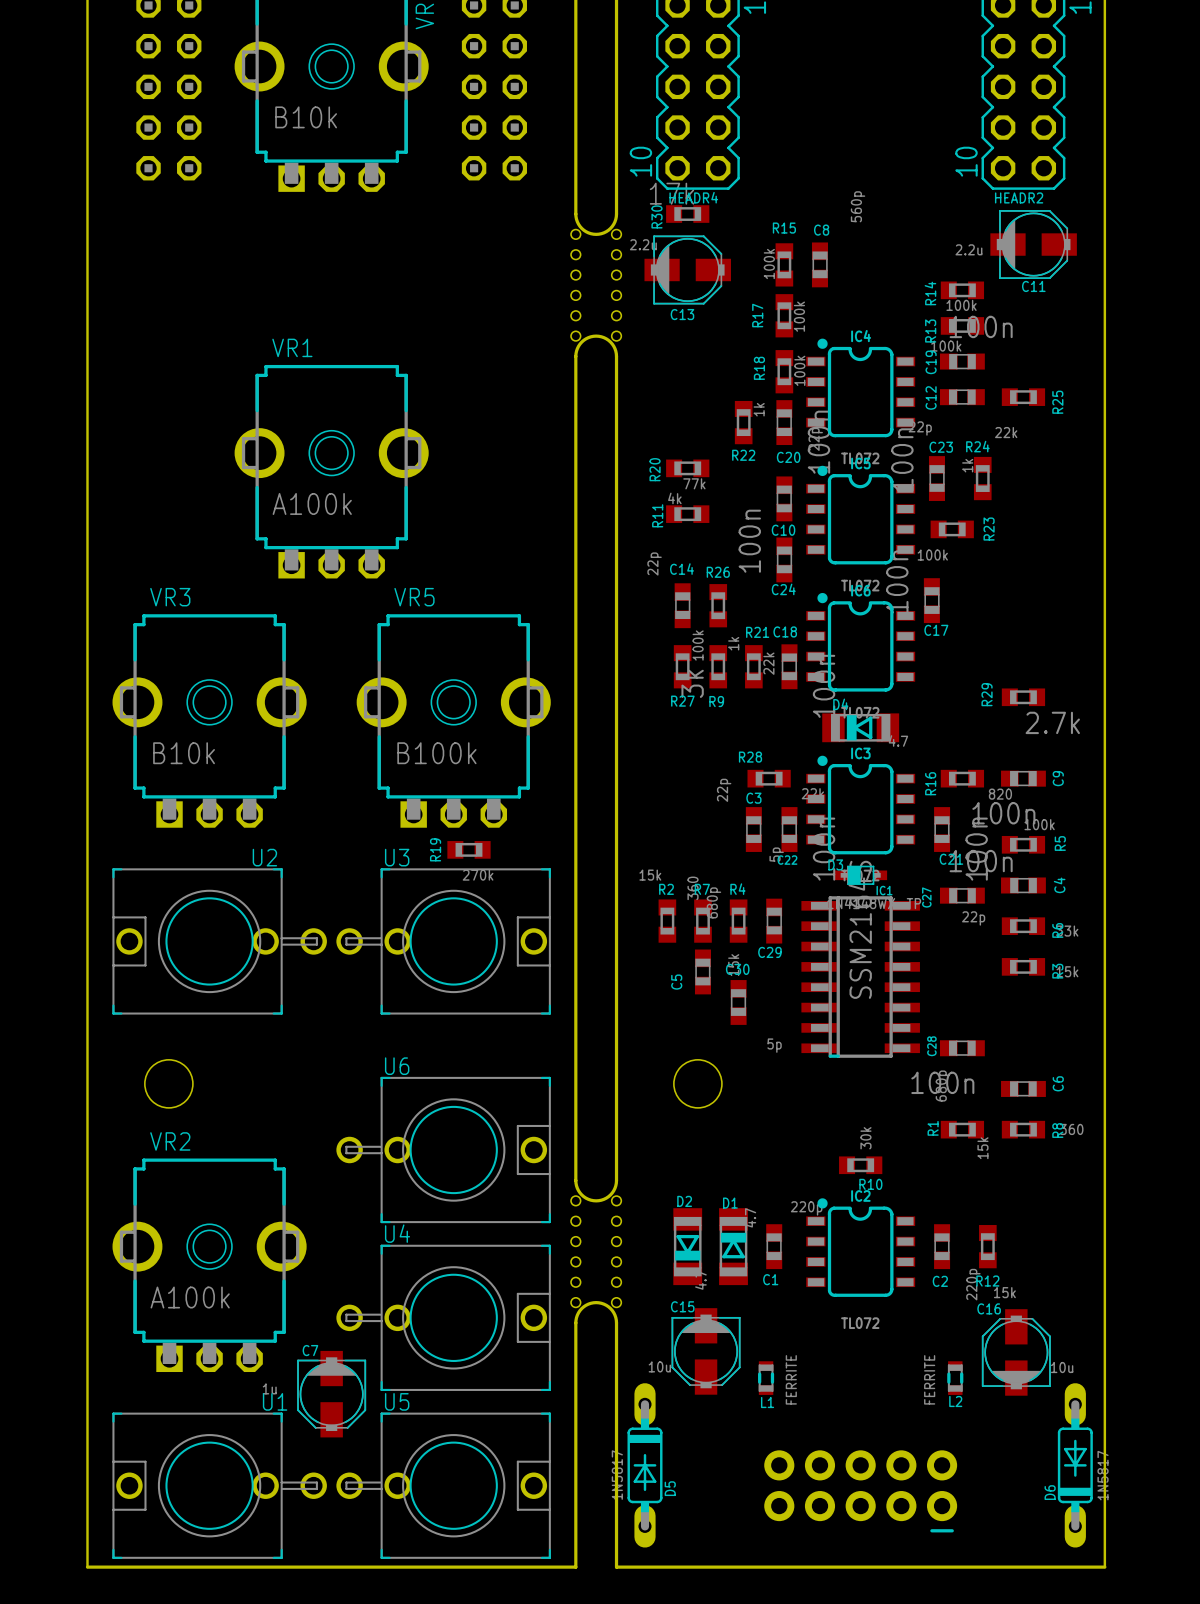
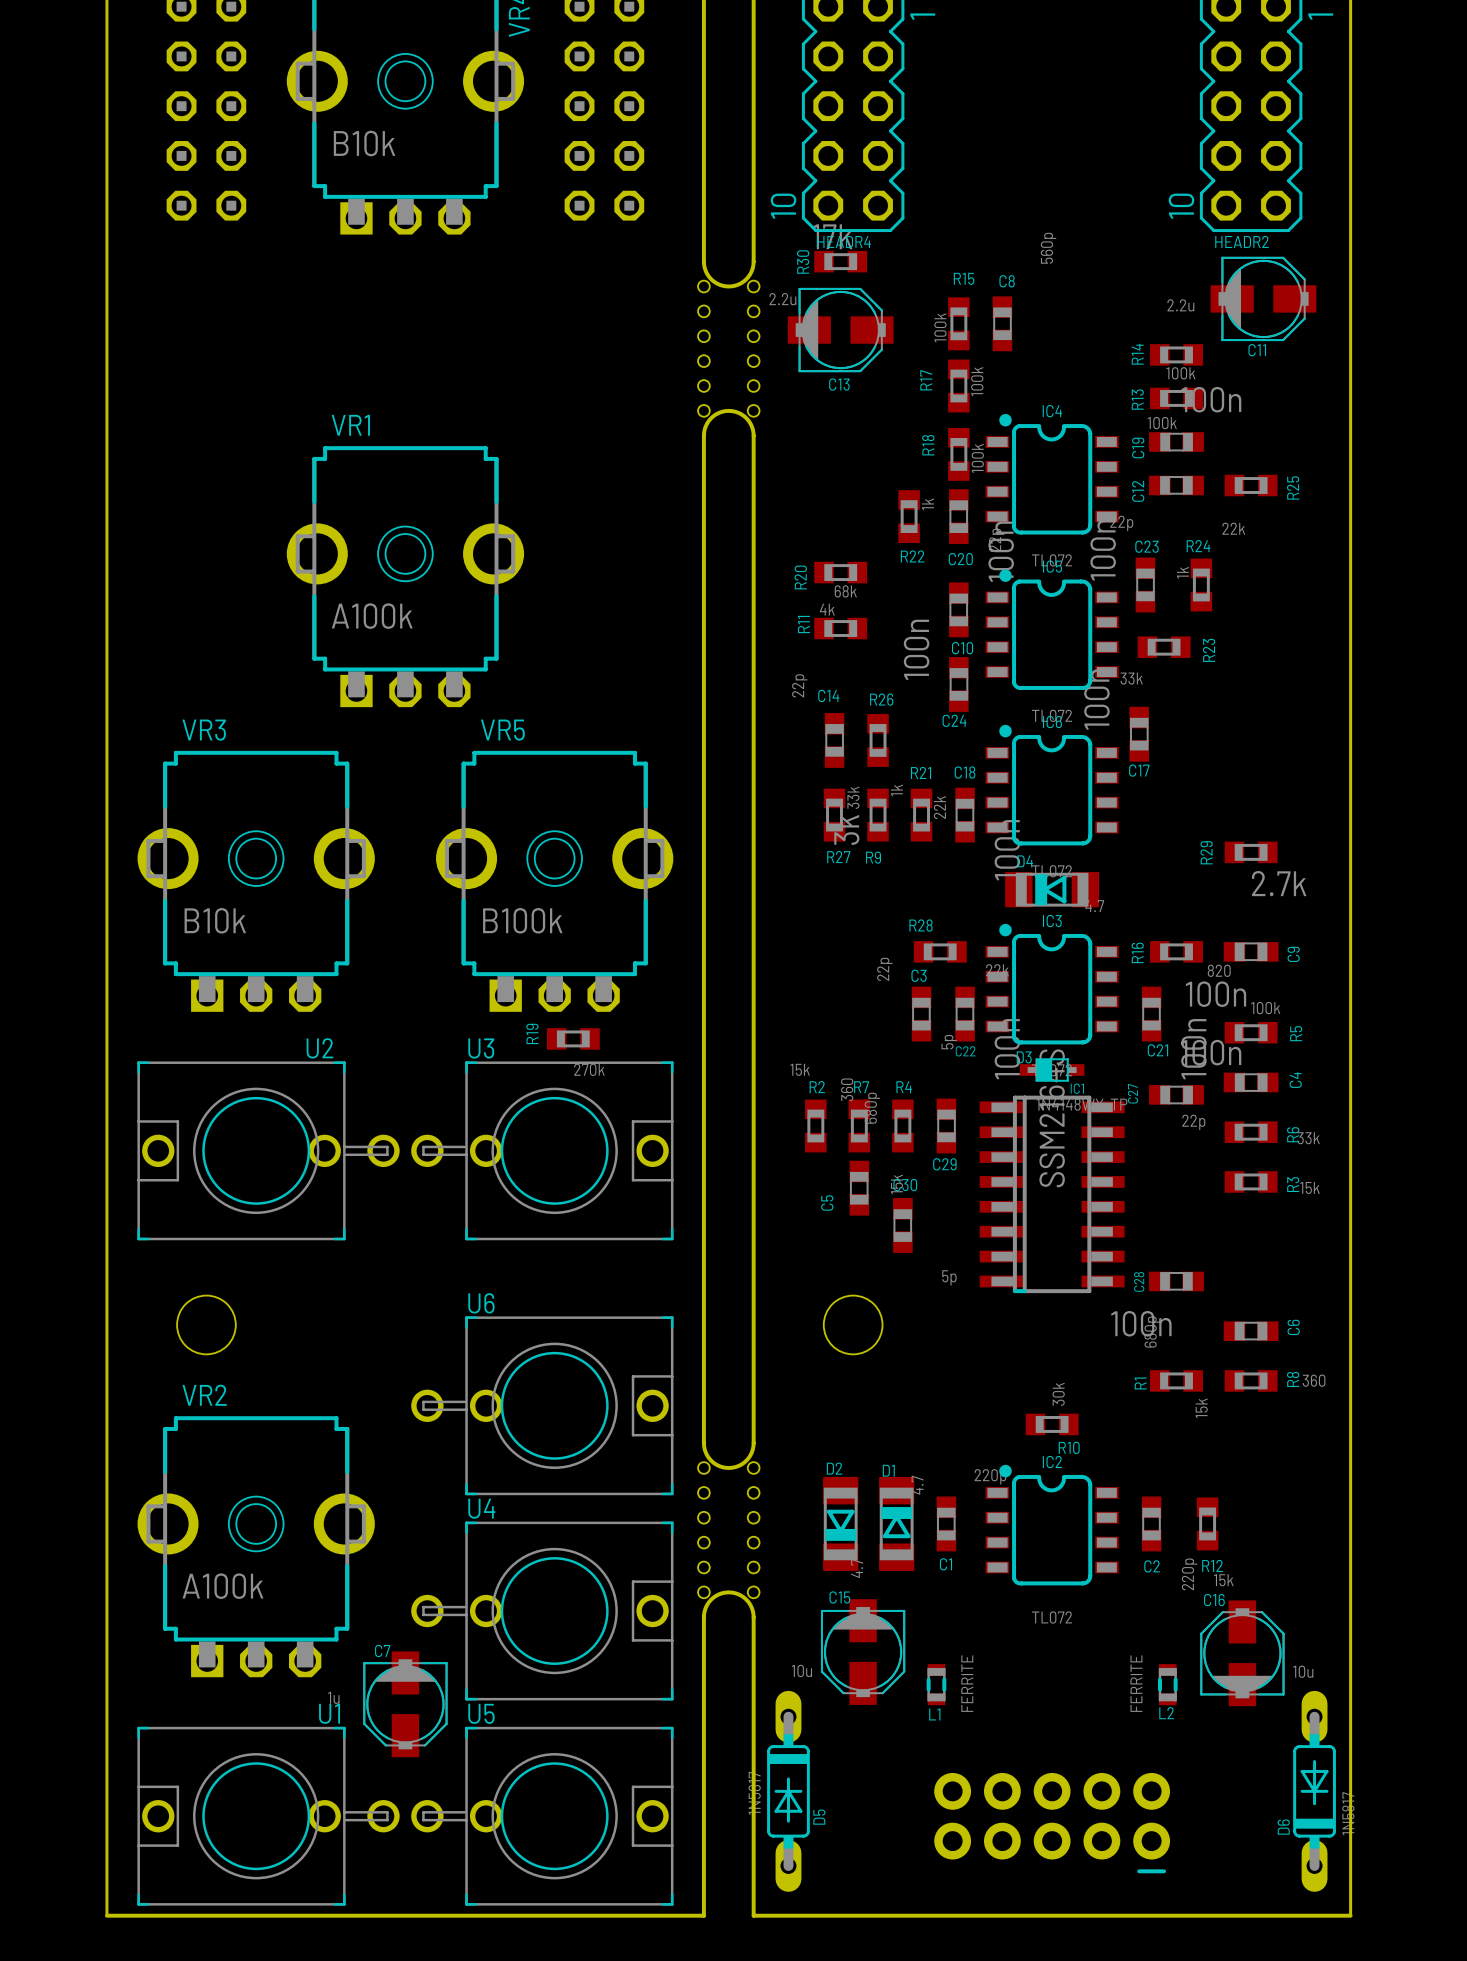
R20 value: 77k (694, 483) -> 68k (845, 591)
R23 value: 100k (932, 555) -> 33k (1131, 678)
R27 value: 100k (698, 645) -> 33k (853, 797)

